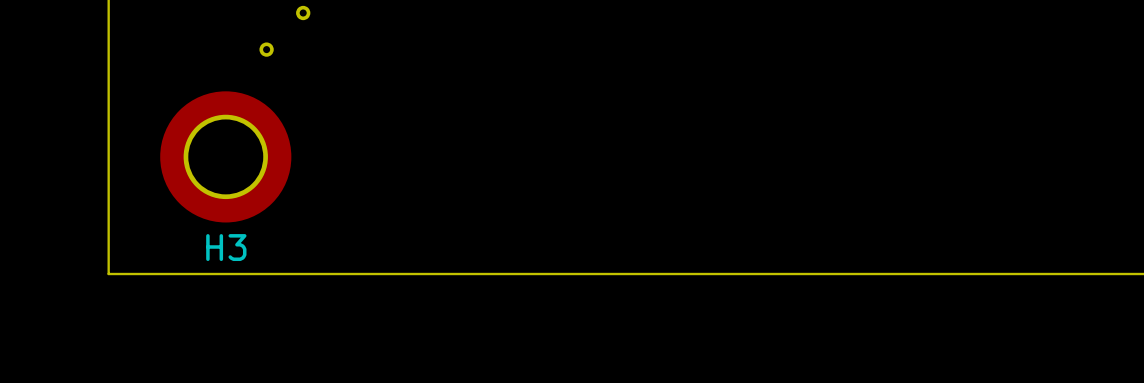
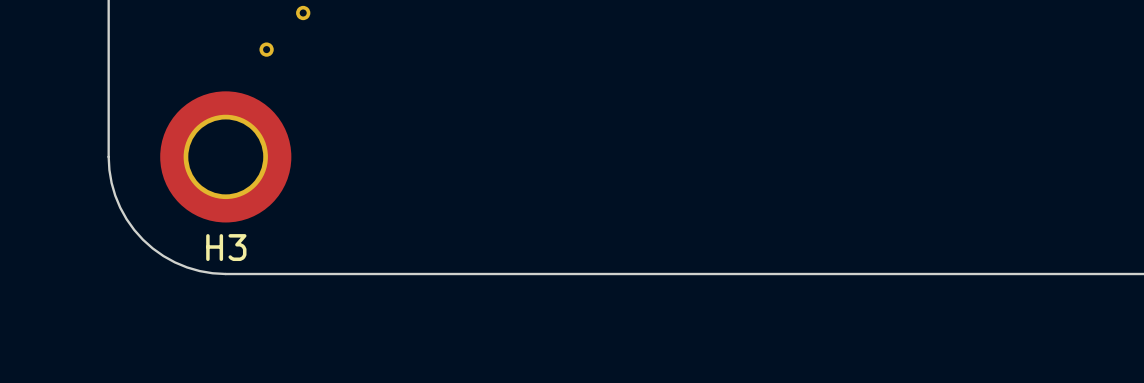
board edge: (108, 156) (108, 274) (225, 274) -> (108, 156) (115, 195) (126, 219) (142, 239) (174, 262) (199, 271) (225, 274)

